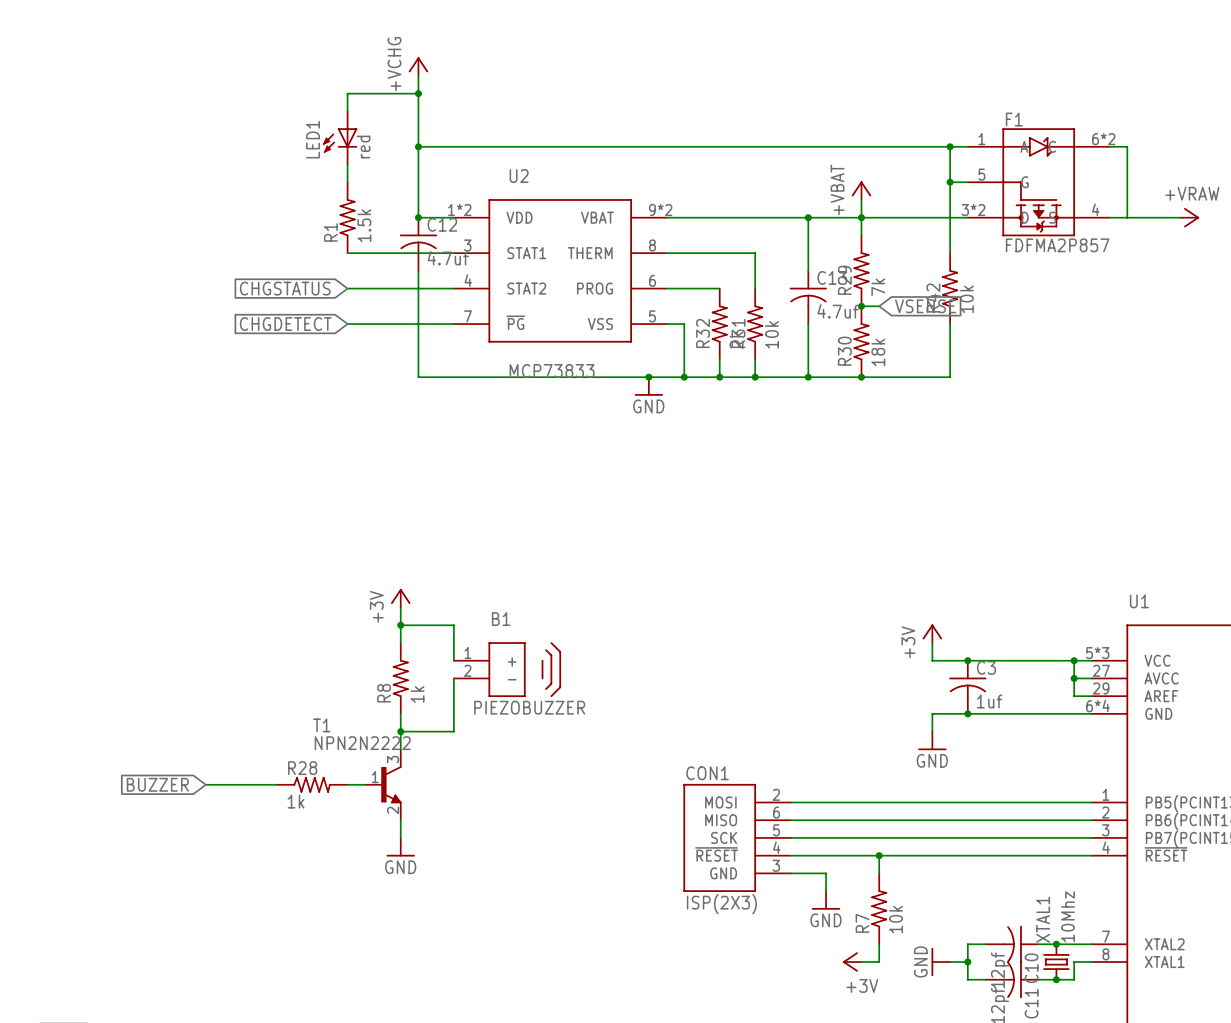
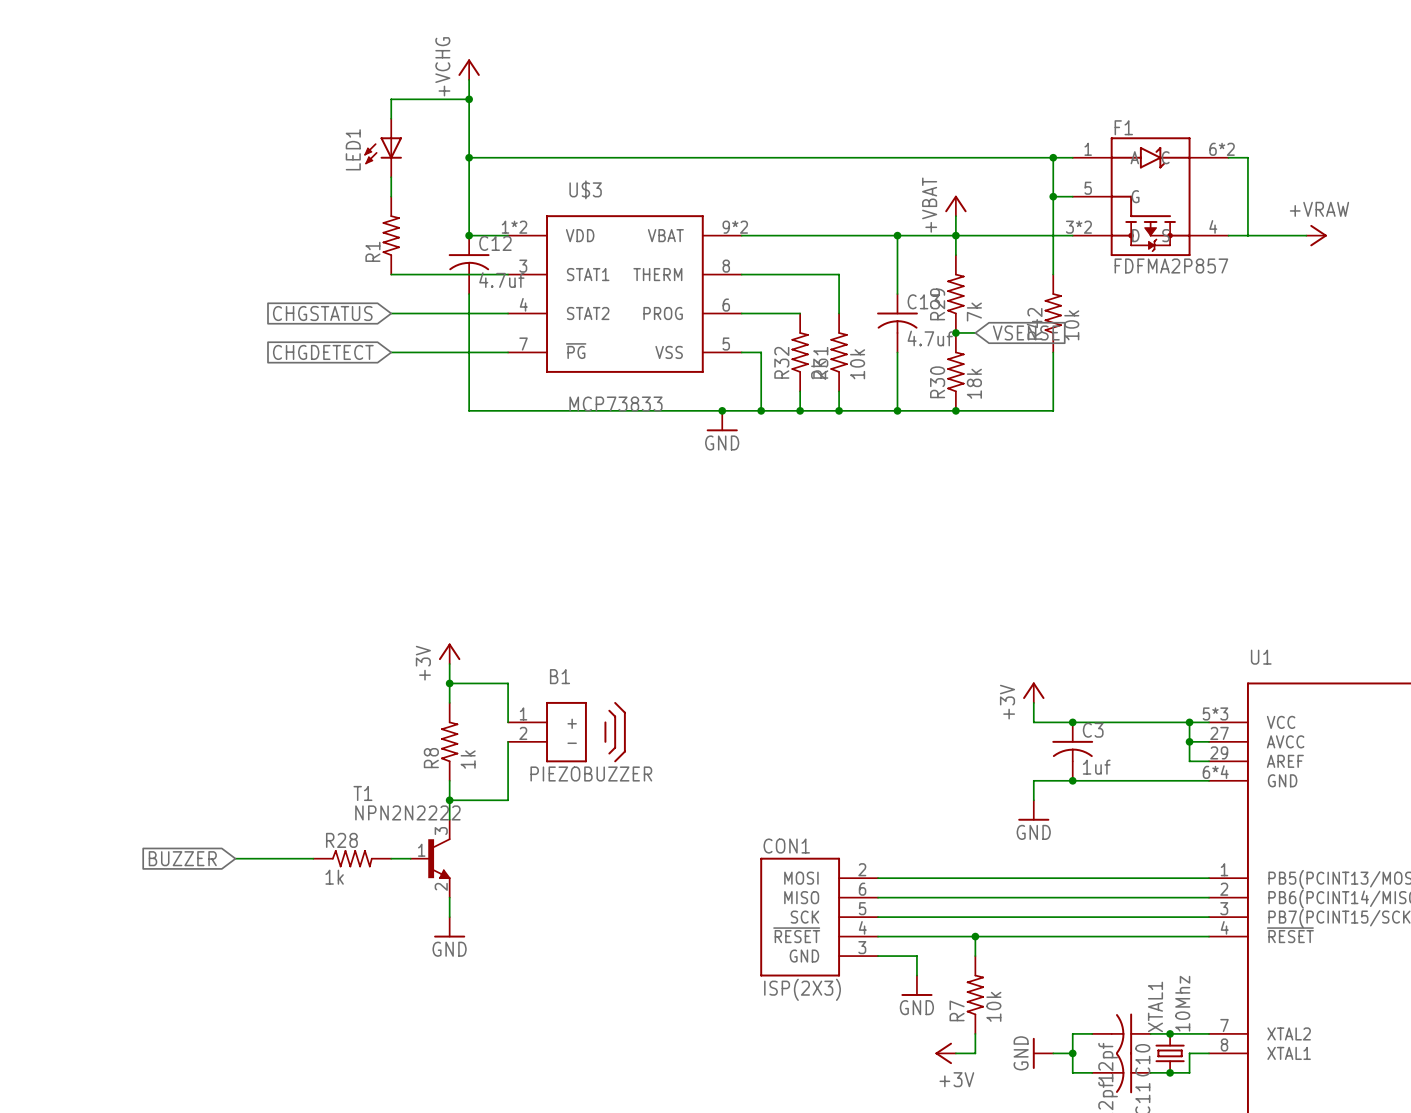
LED1 value: red (363, 147) -> none
U2 name: U2 (519, 176) -> U$3 (585, 189)
R1 value: 1.5k (364, 225) -> none

